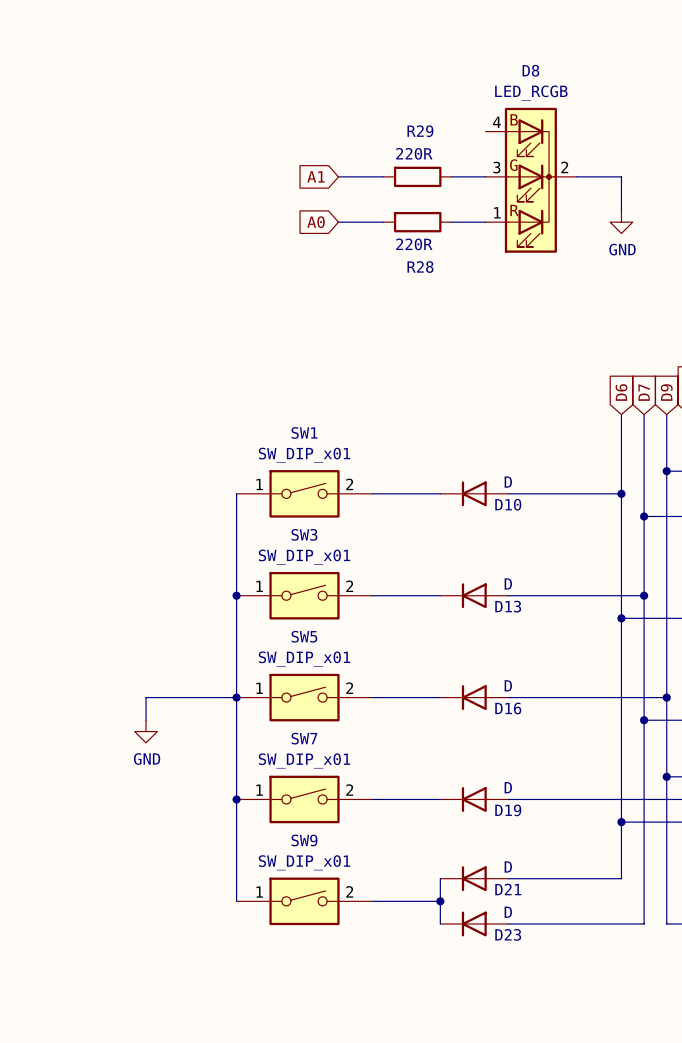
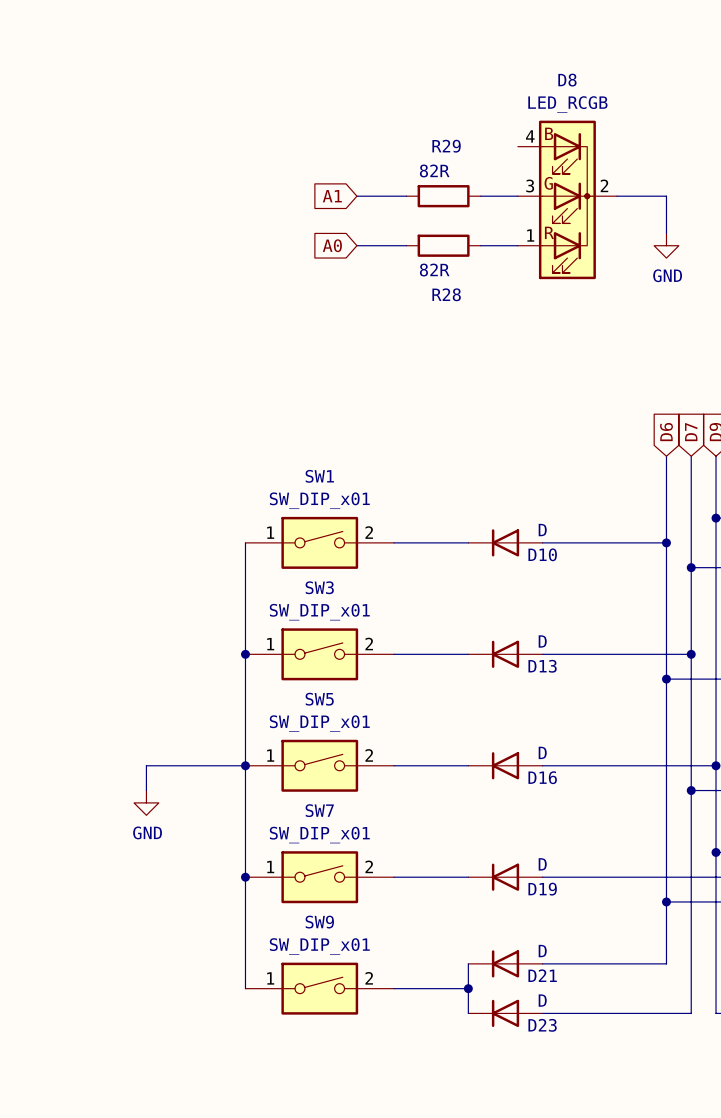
R29 value: 220R (414, 153) -> 82R (434, 170)
R28 value: 220R (414, 244) -> 82R (434, 270)

